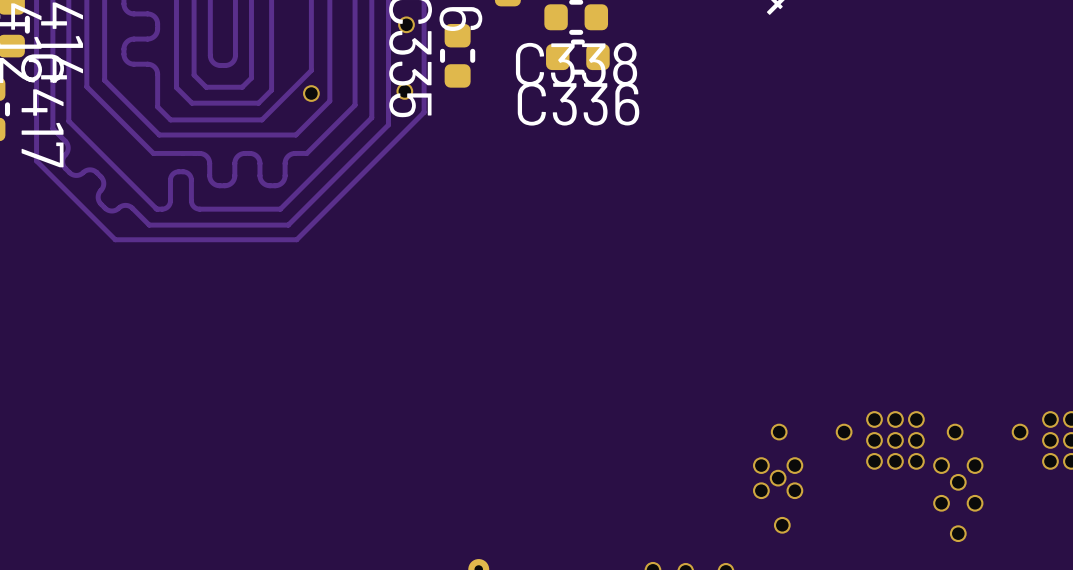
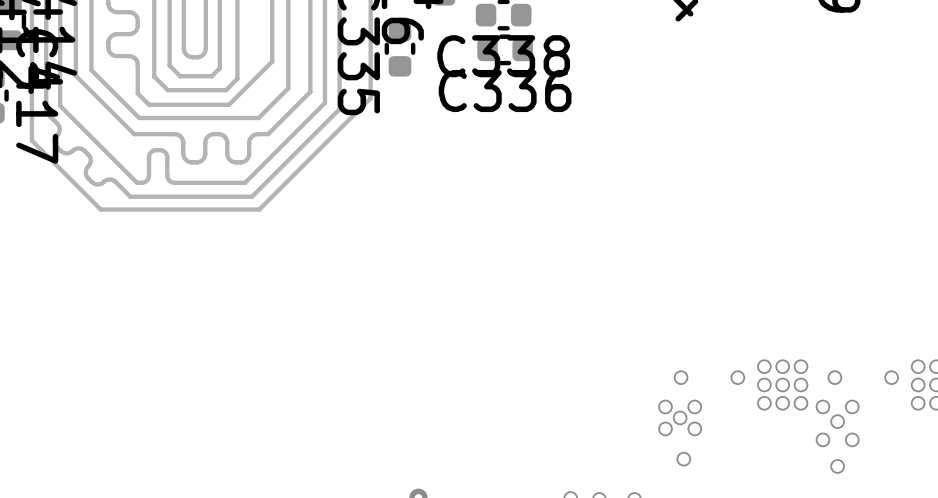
via: (406, 24) -> none
via: (404, 91) -> none
via: (311, 93) -> none

